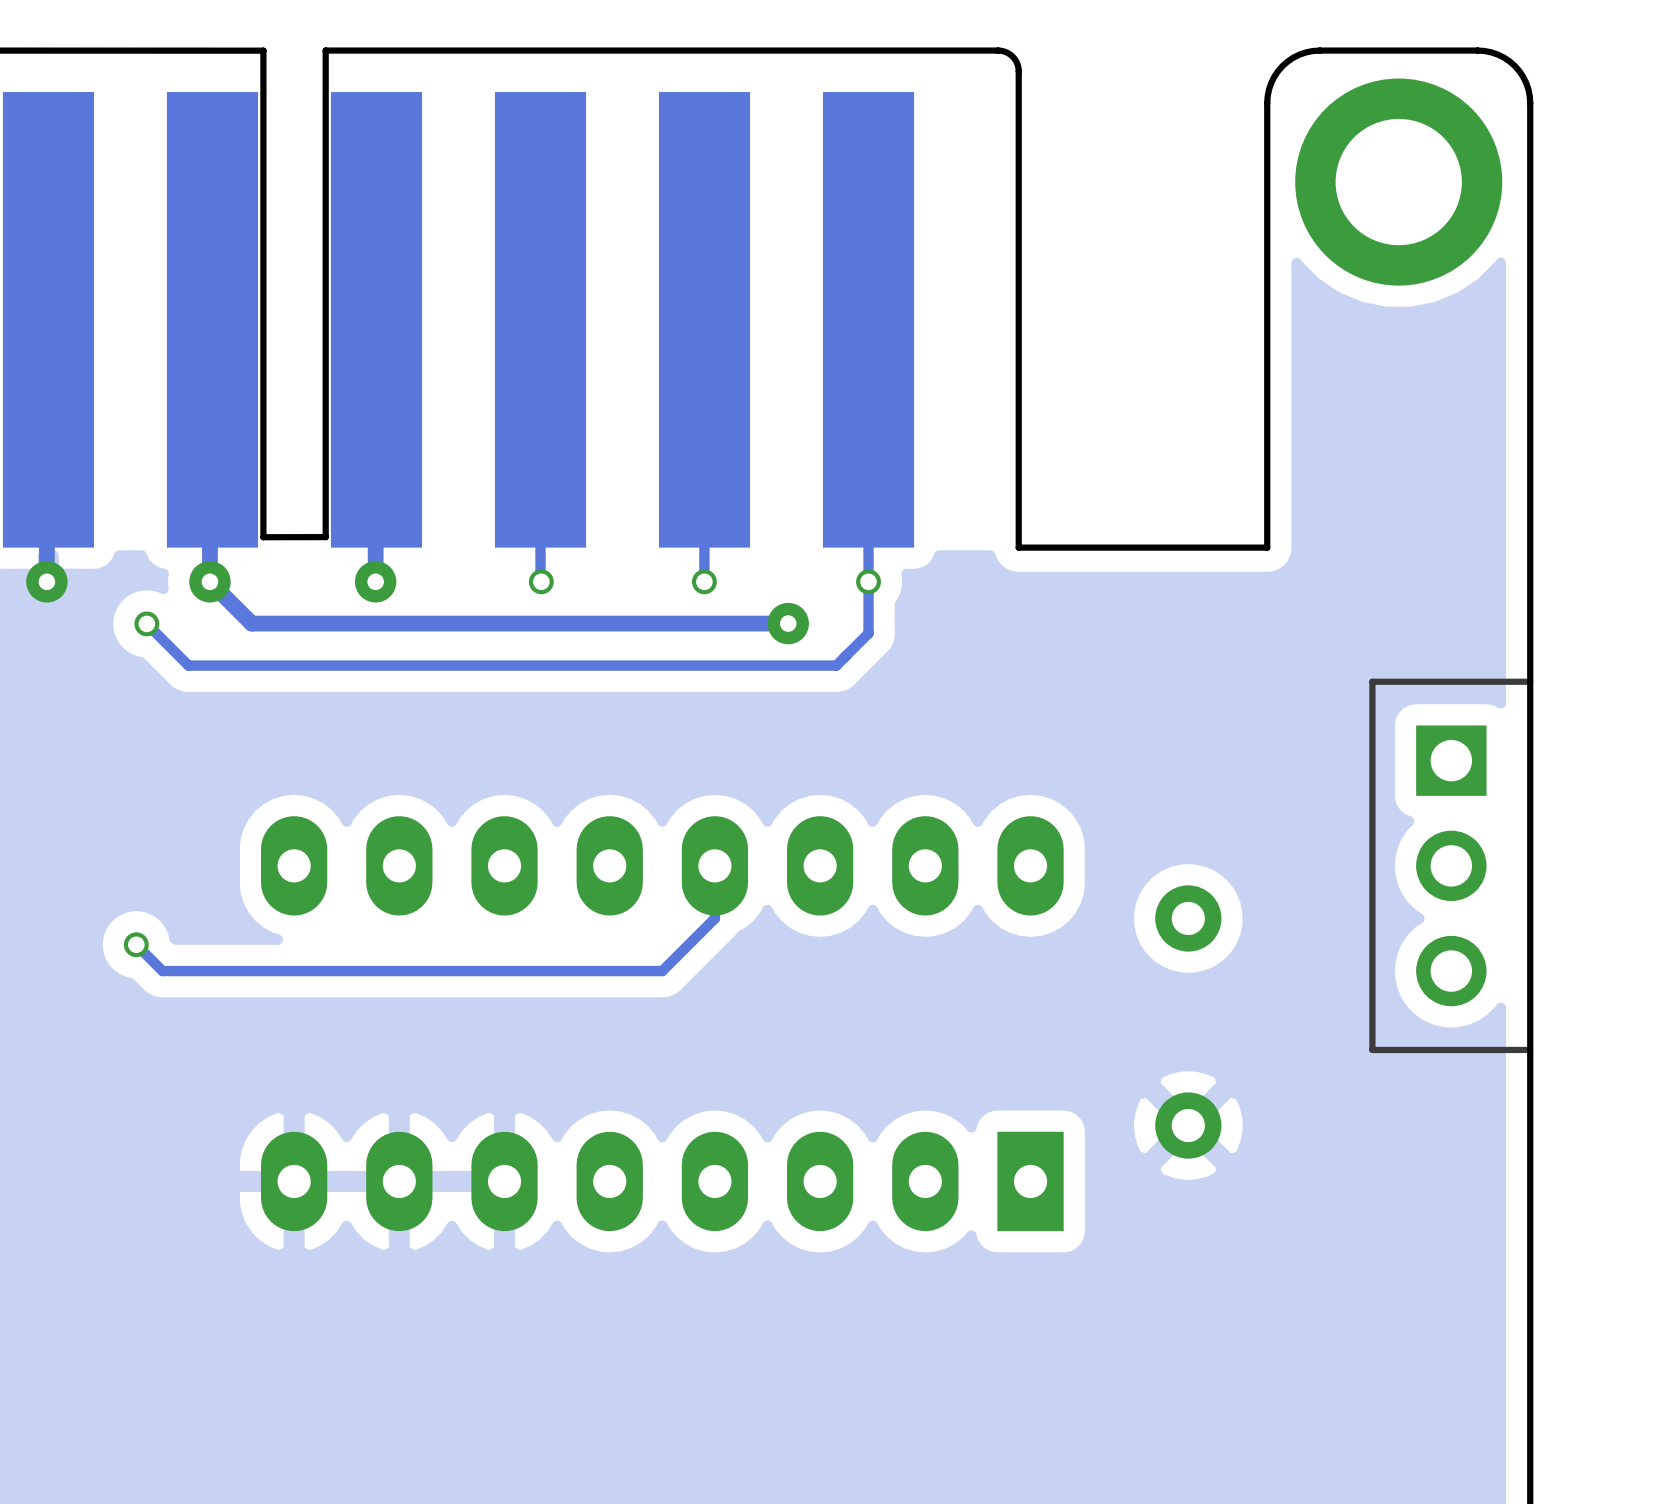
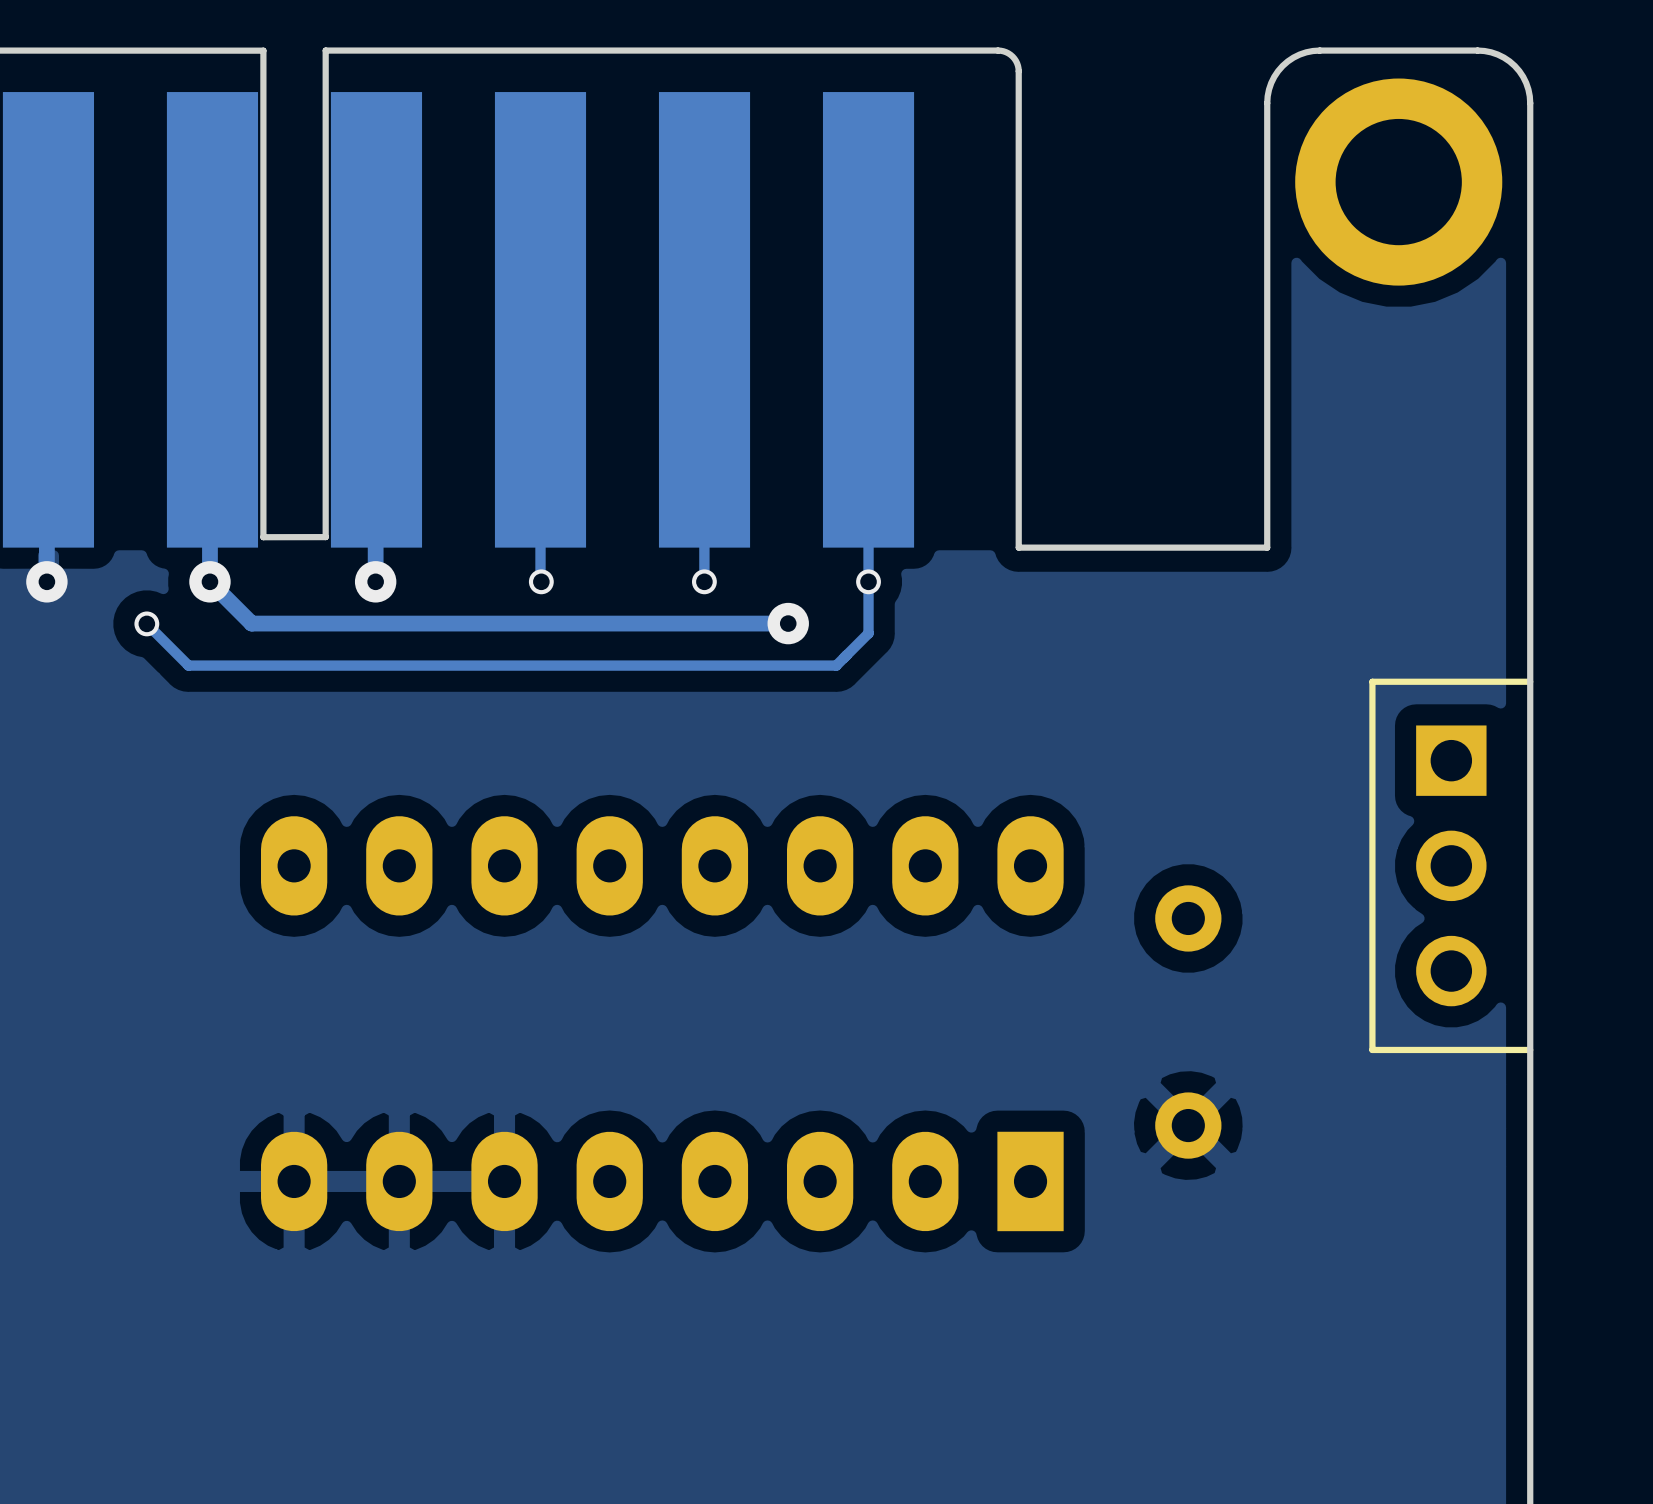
track: (714, 865) (714, 918) (662, 971) (162, 971) (136, 944) -> none
via: (136, 944) -> none

